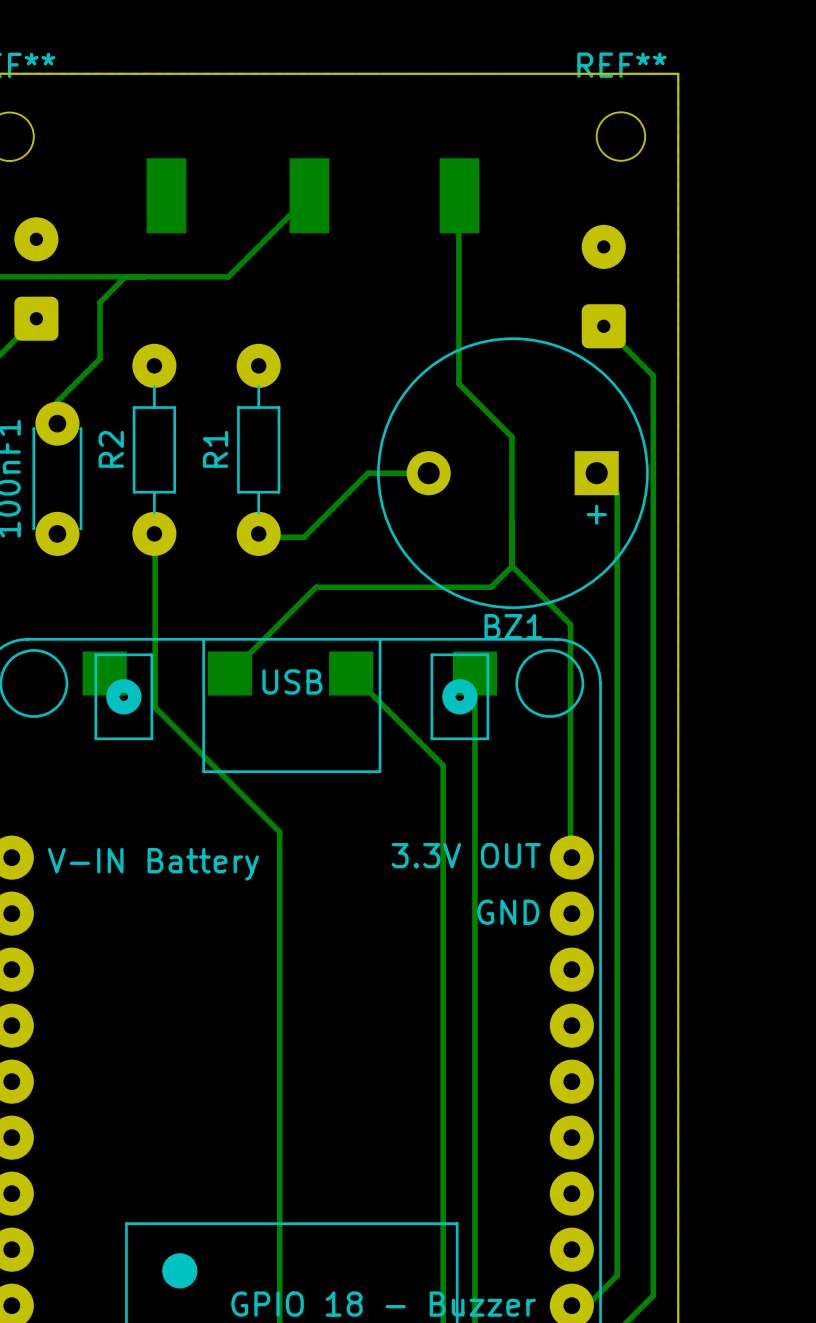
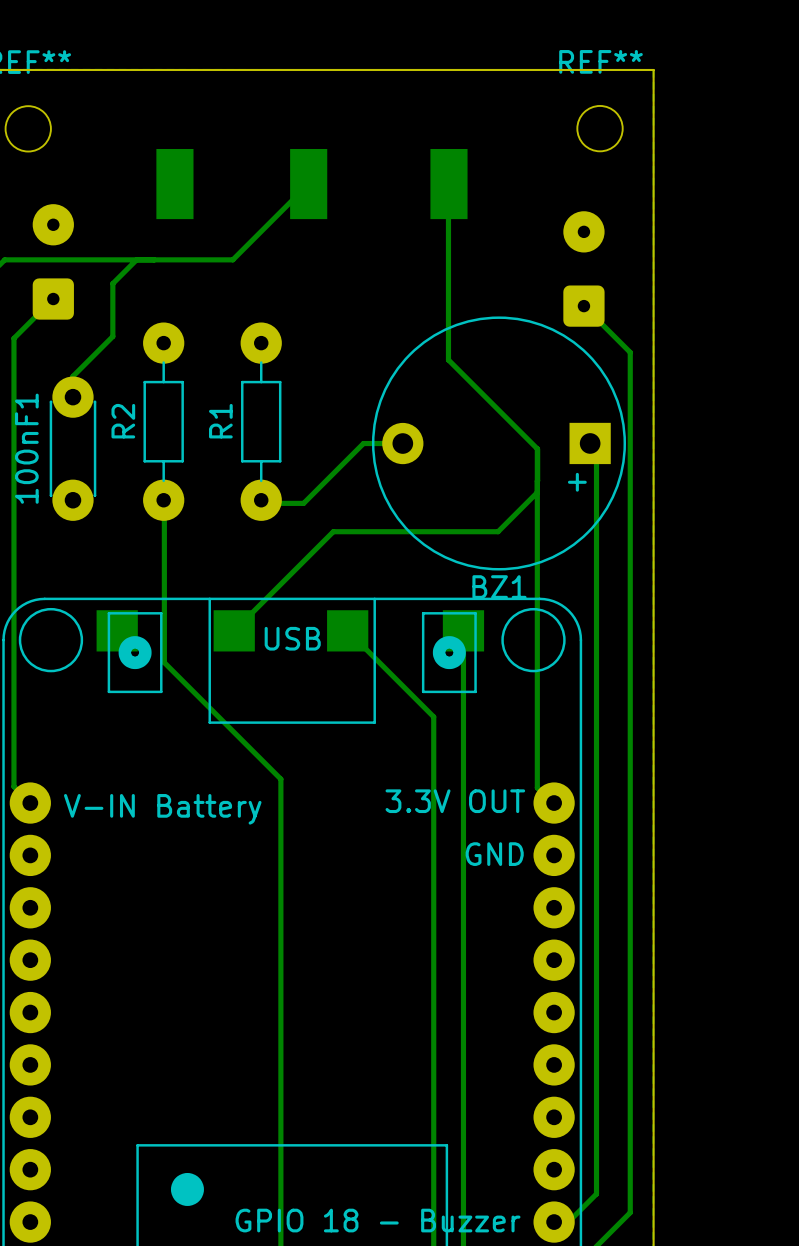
BZ1 footprint: [377, 337, 649, 609] -> [371, 316, 627, 571]
bottom track: (511, 436) (511, 565) (570, 624) (570, 858) -> (498, 409) (537, 448) (537, 787) (552, 803)
bottom track: (511, 521) (511, 566) (491, 587) (316, 587) -> (537, 492) (498, 531) (333, 531) (314, 550)

